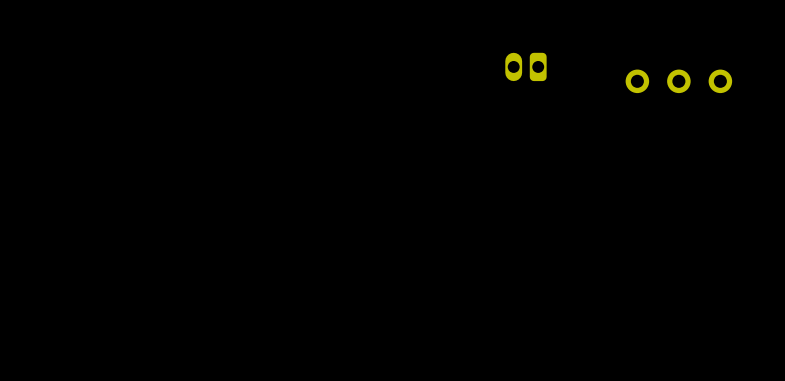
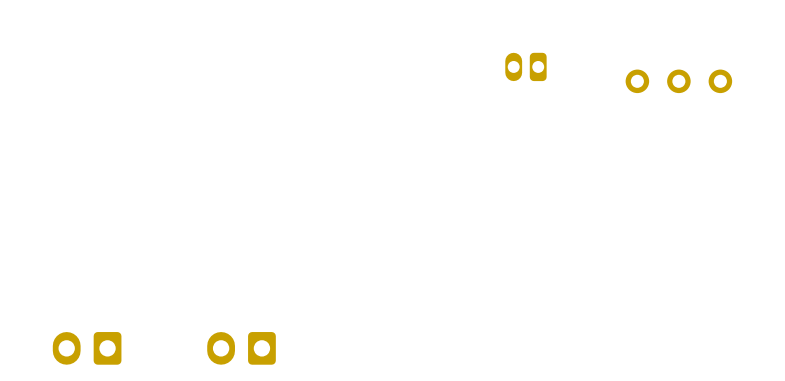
part: none -> (87, 348)
part: none -> (241, 348)

